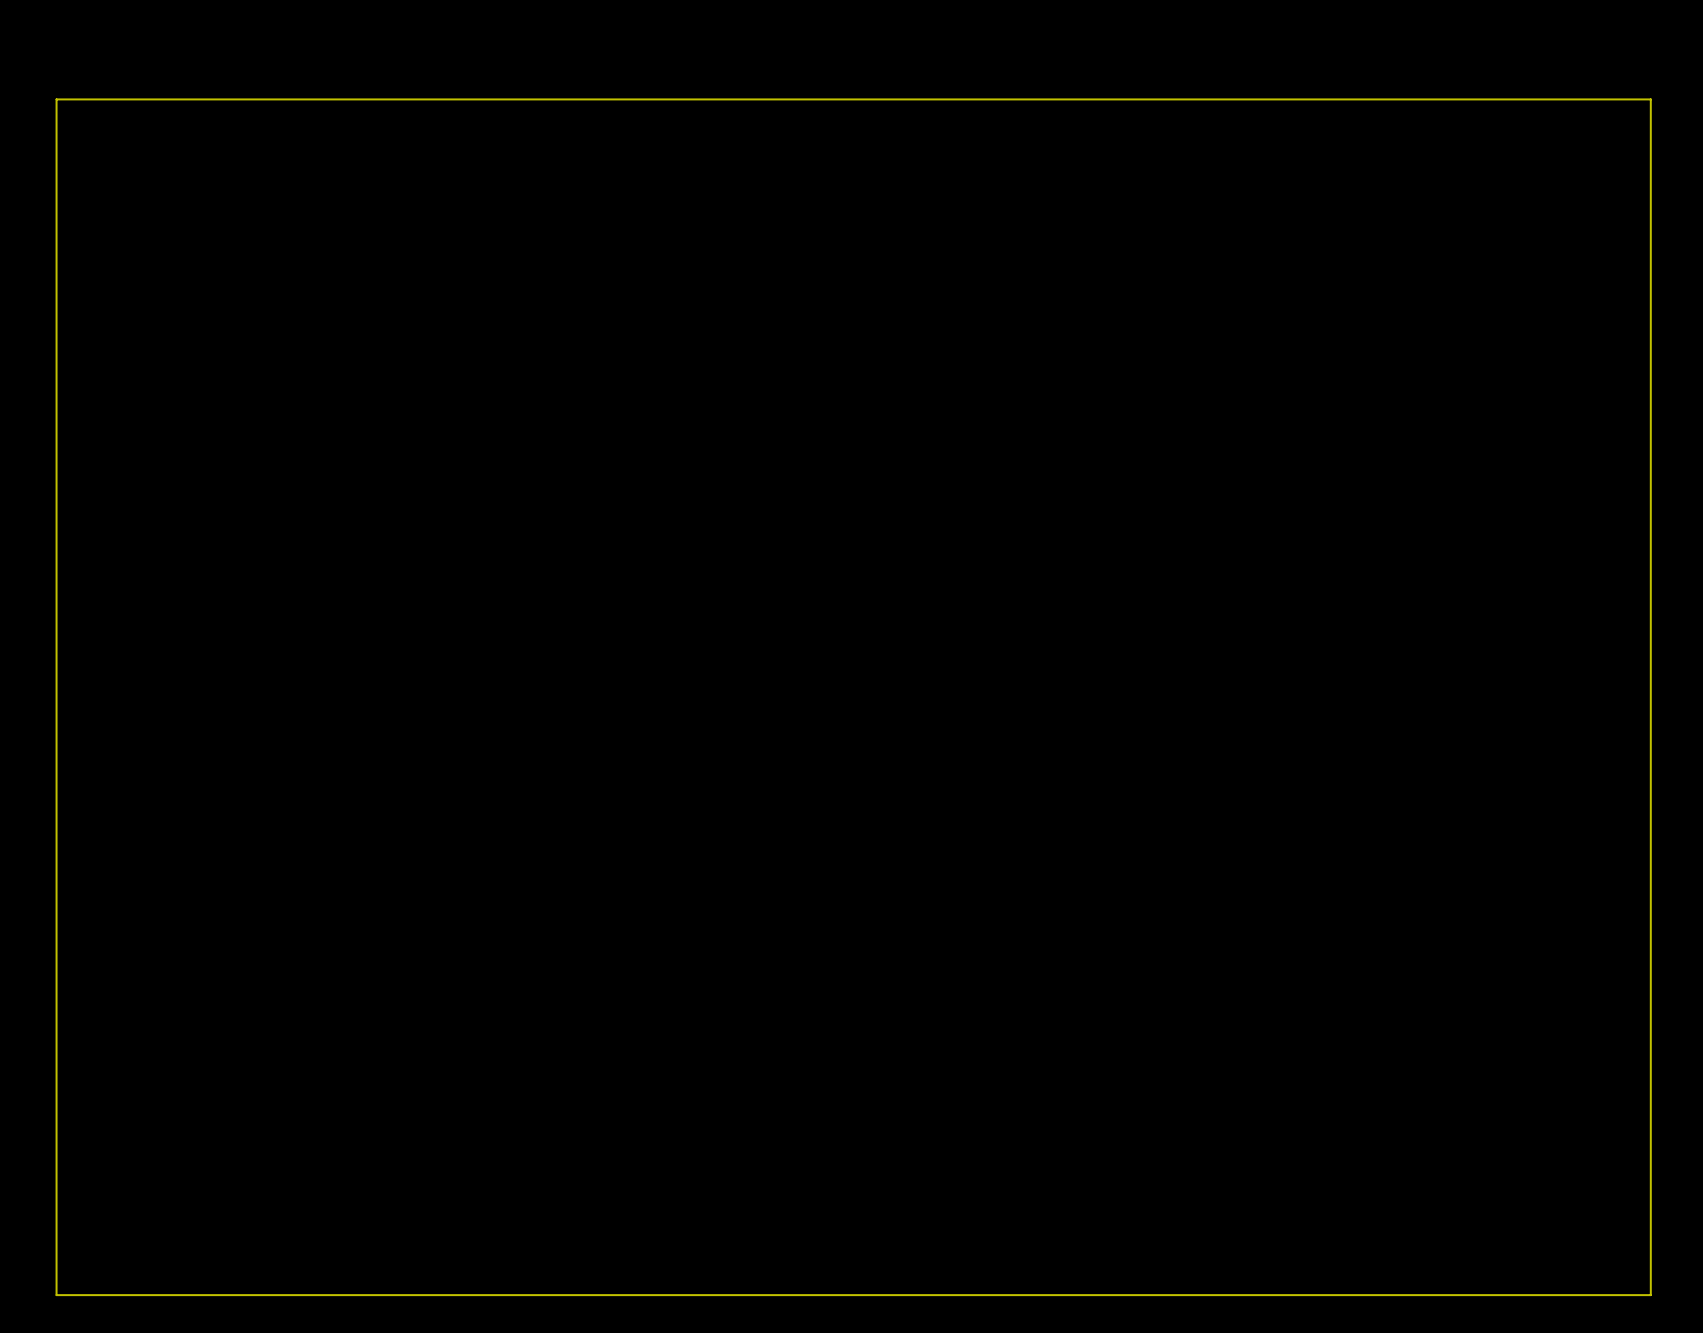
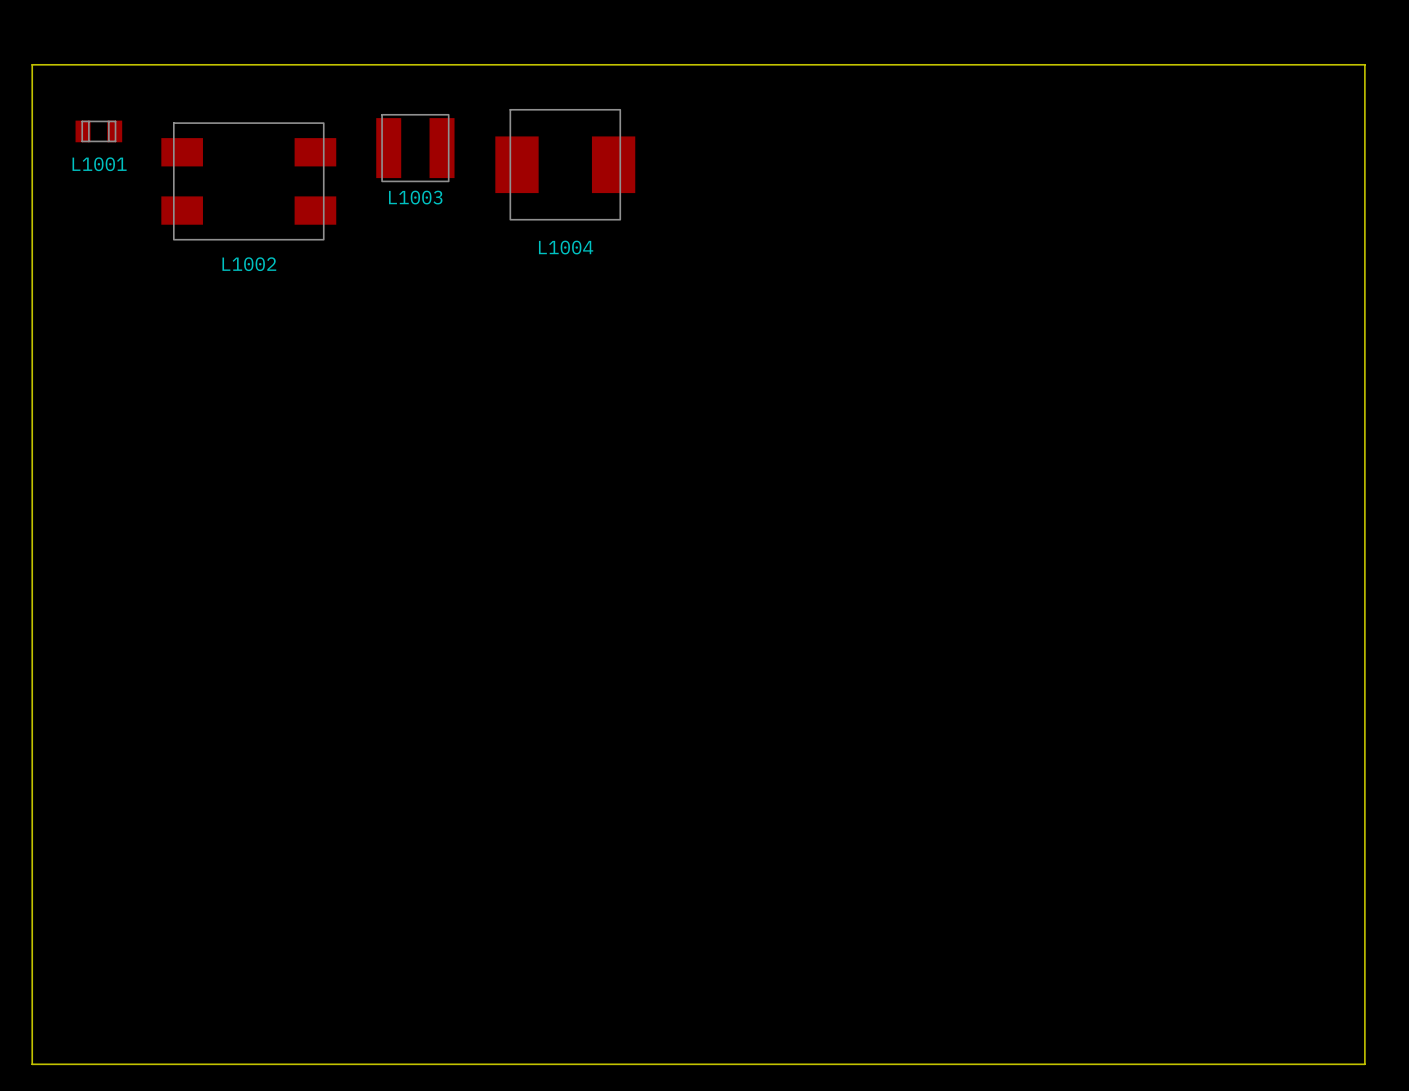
L1001: none -> (98, 131)
L1003: none -> (415, 148)
L1004: none -> (565, 164)
L1002: none -> (248, 181)

